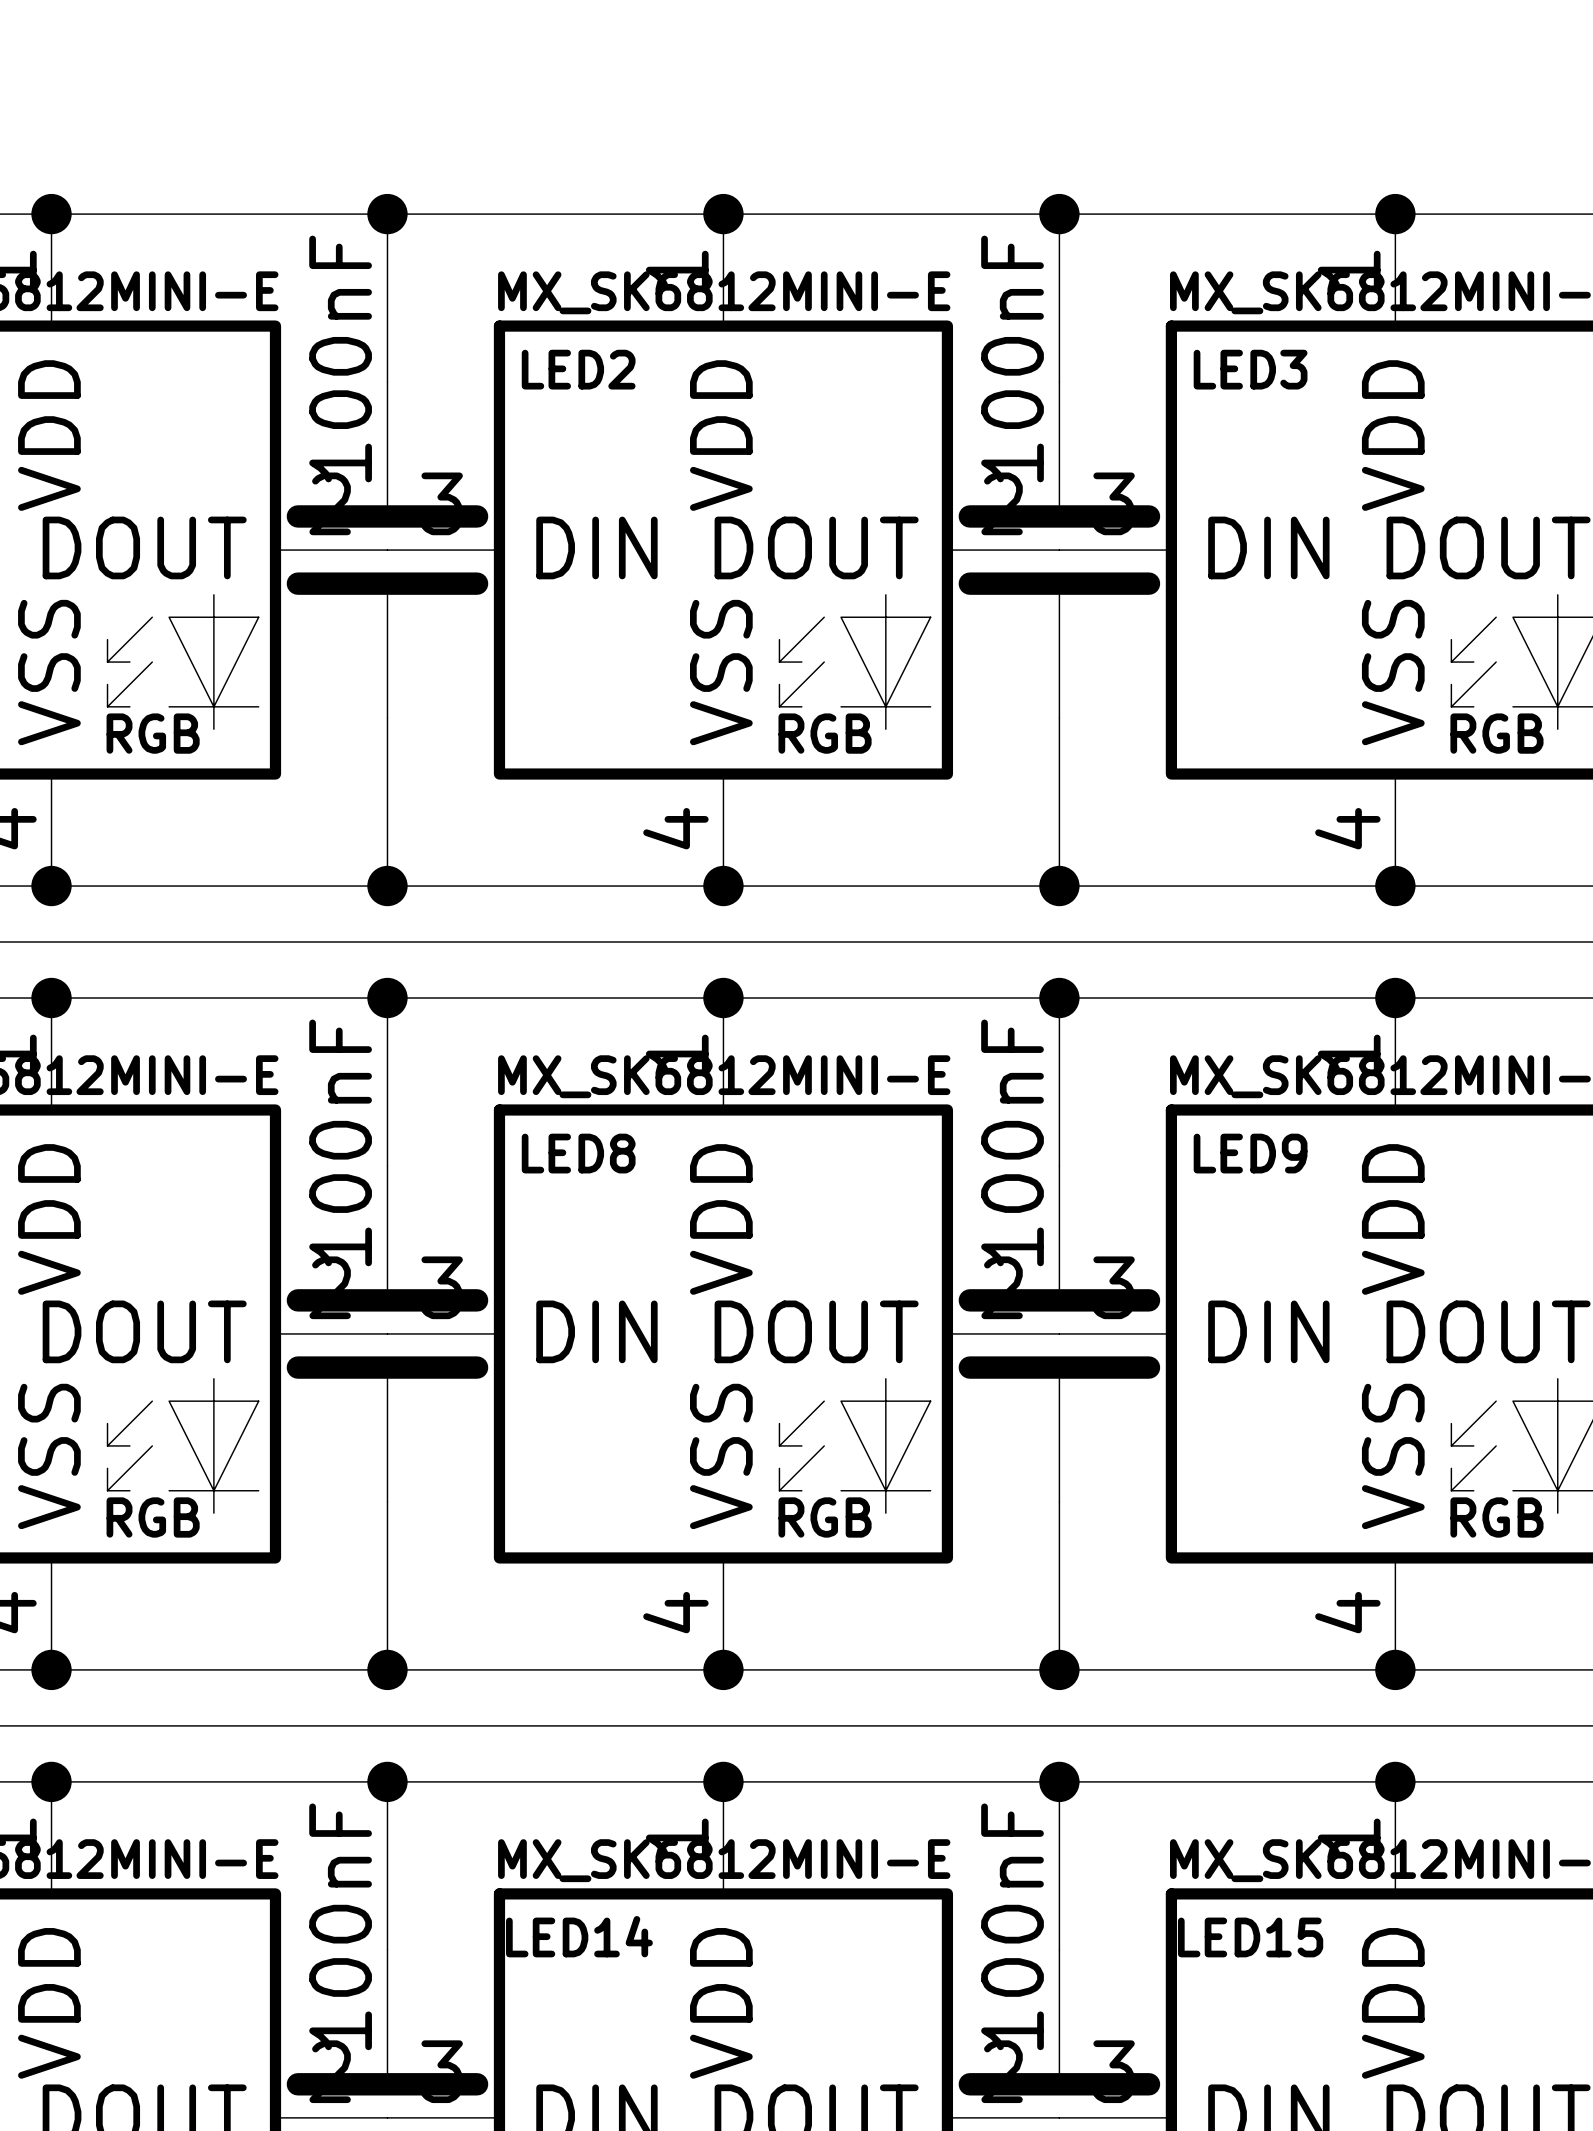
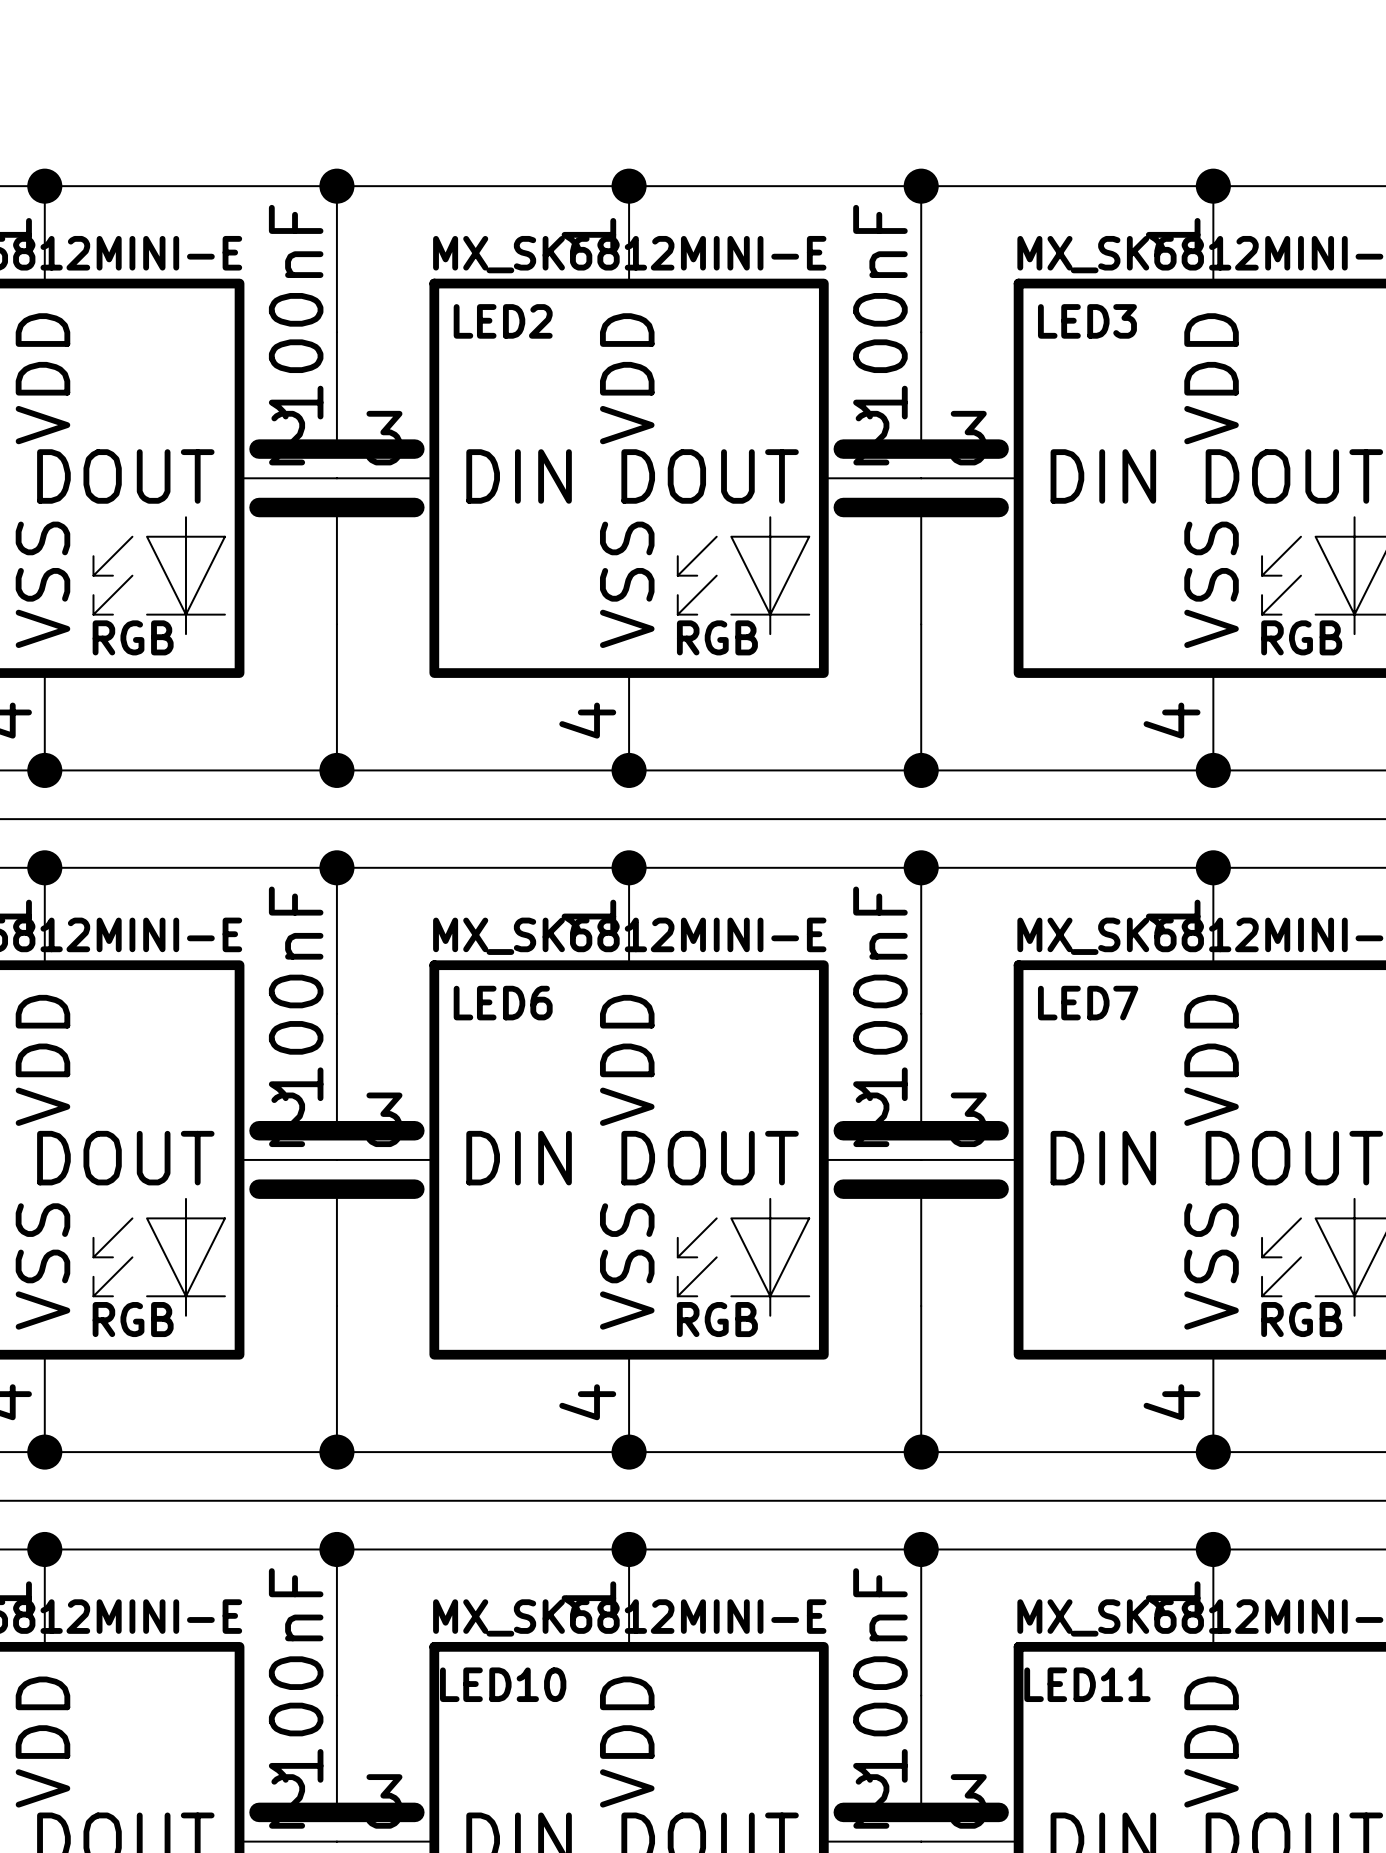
LED8 name: LED8 (578, 1153) -> LED6 (503, 1003)
LED9 name: LED9 (1250, 1153) -> LED7 (1088, 1003)
LED14 name: LED14 (579, 1936) -> LED10 (503, 1684)
LED15 name: LED15 (1250, 1937) -> LED11 (1087, 1684)

